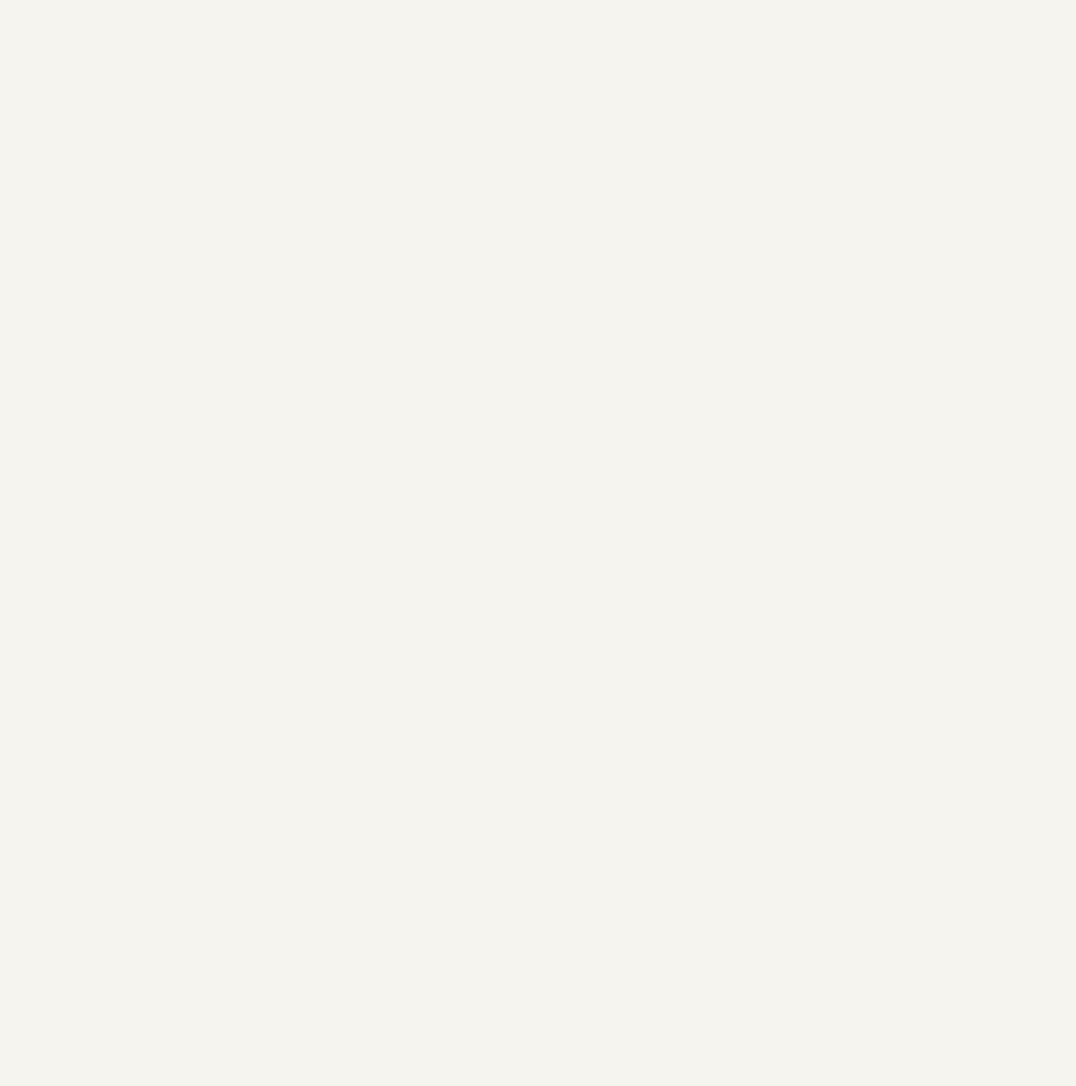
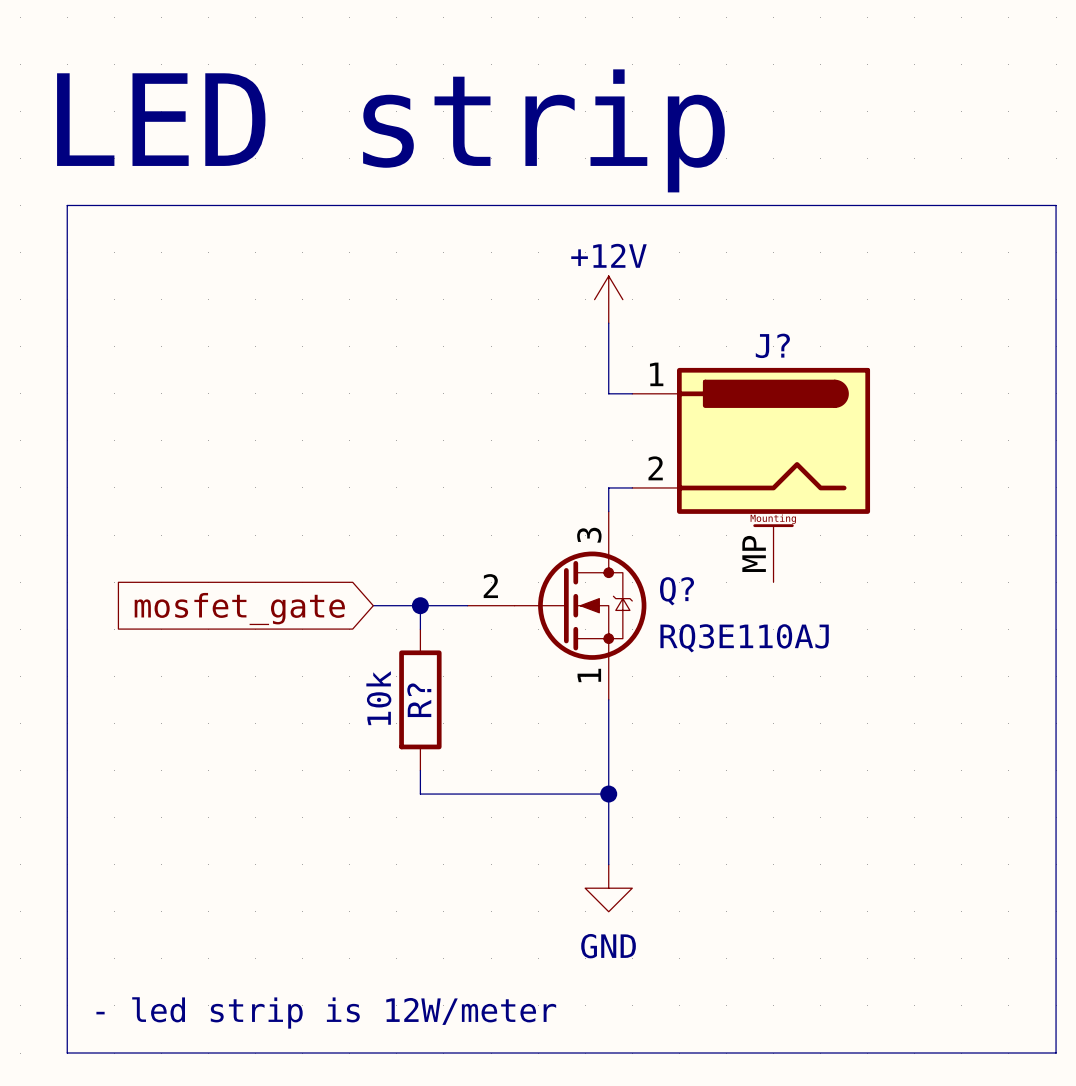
text: none -> LED strip (390, 130)
line: none -> (67, 205) (67, 1053) (1056, 1053) (1056, 205) (67, 205)
power symbol: none -> +12V (608, 299)
wire: none -> (608, 323) (608, 393) (632, 393)
J?: none -> (751, 475)
wire: none -> (632, 487) (608, 487) (608, 511)
wire: none -> (373, 605) (467, 605)
wire: none -> (420, 605) (420, 629)
junction: none -> (420, 605)
Q?: none -> RQ3E110AJ (556, 605)
global label: none -> mosfet_gate (239, 609)
R?: none -> 10k (420, 699)
wire: none -> (608, 699) (608, 864)
wire: none -> (420, 770) (420, 794) (608, 794)
junction: none -> (608, 794)
power symbol: none -> GND (608, 888)
text: none -> - led strip is 12W/meter (326, 1012)

